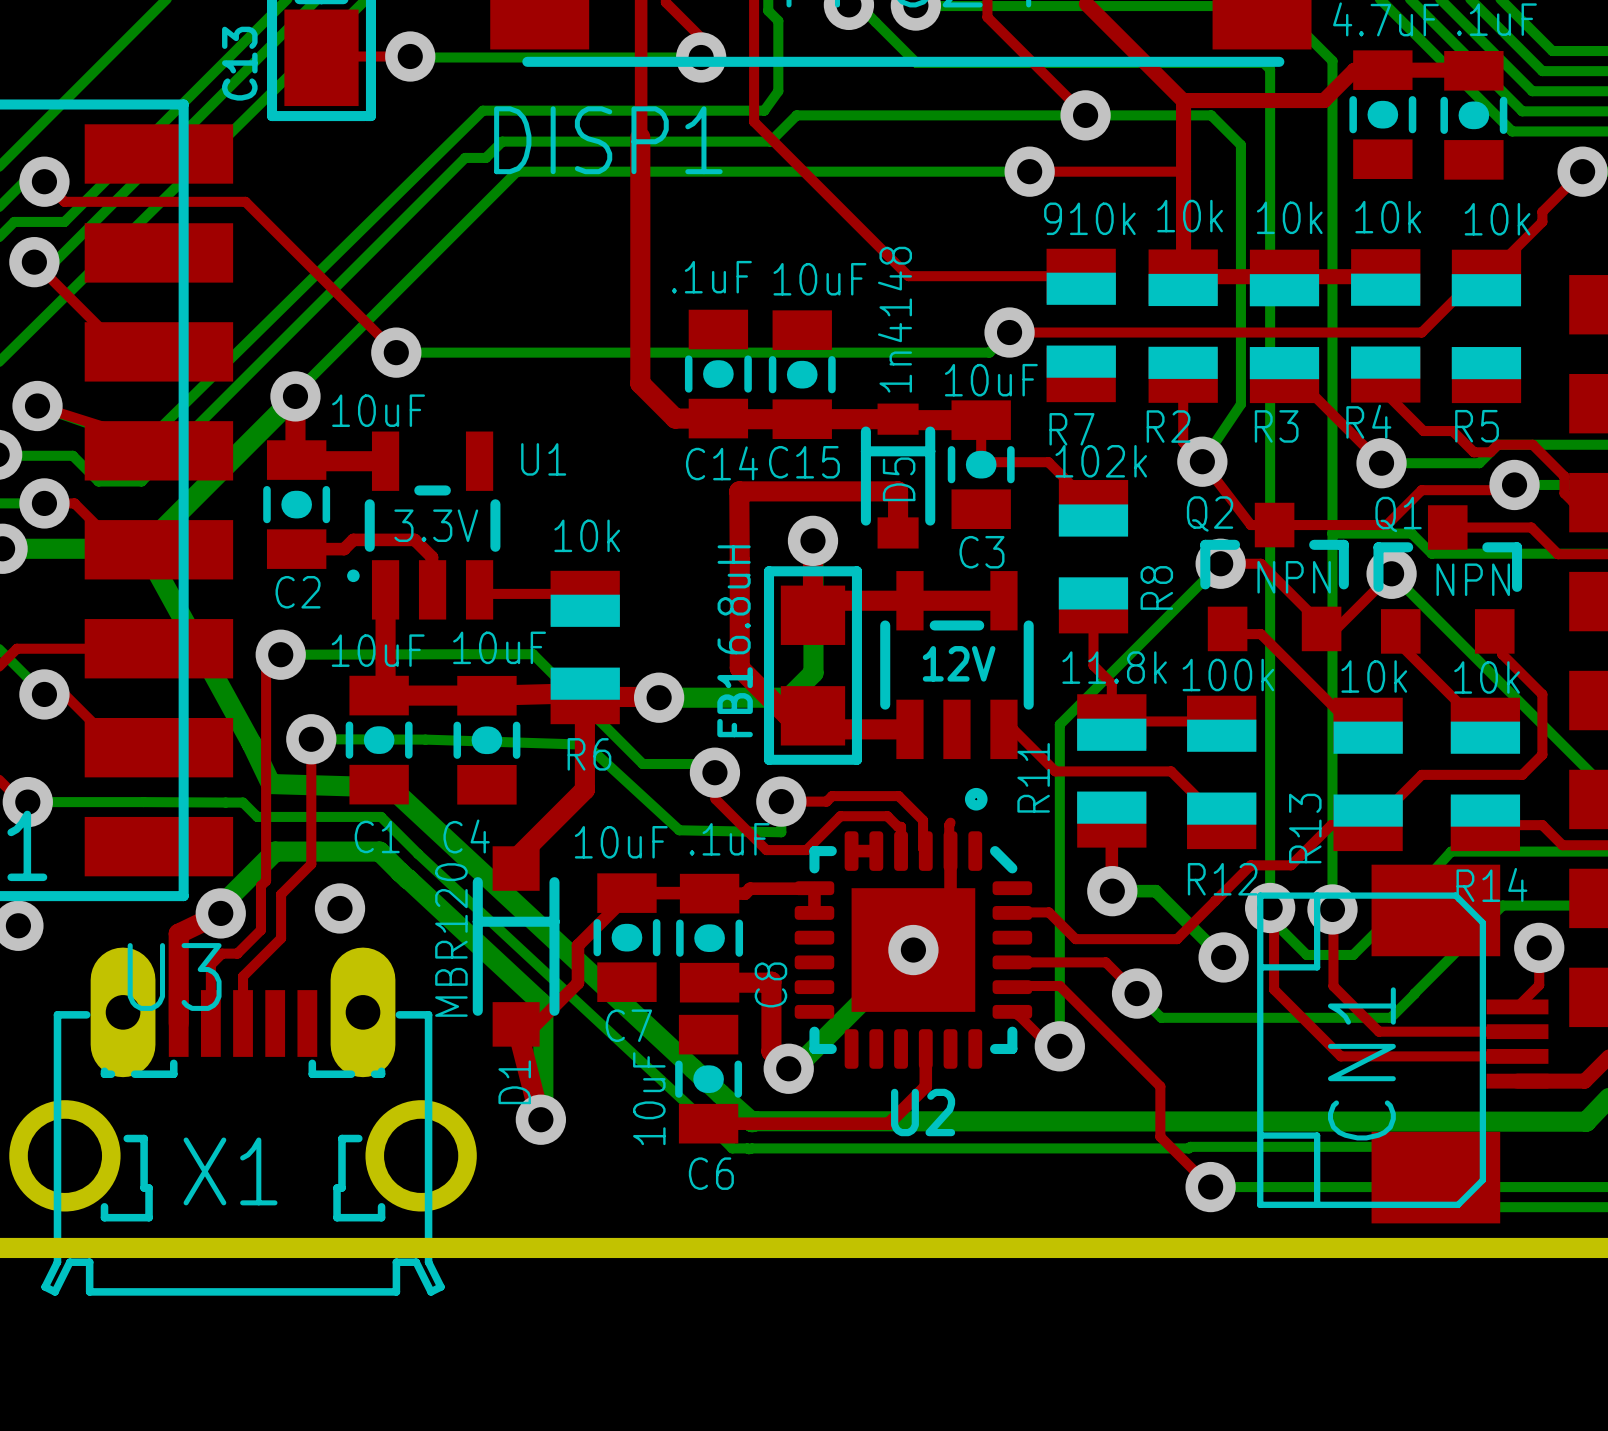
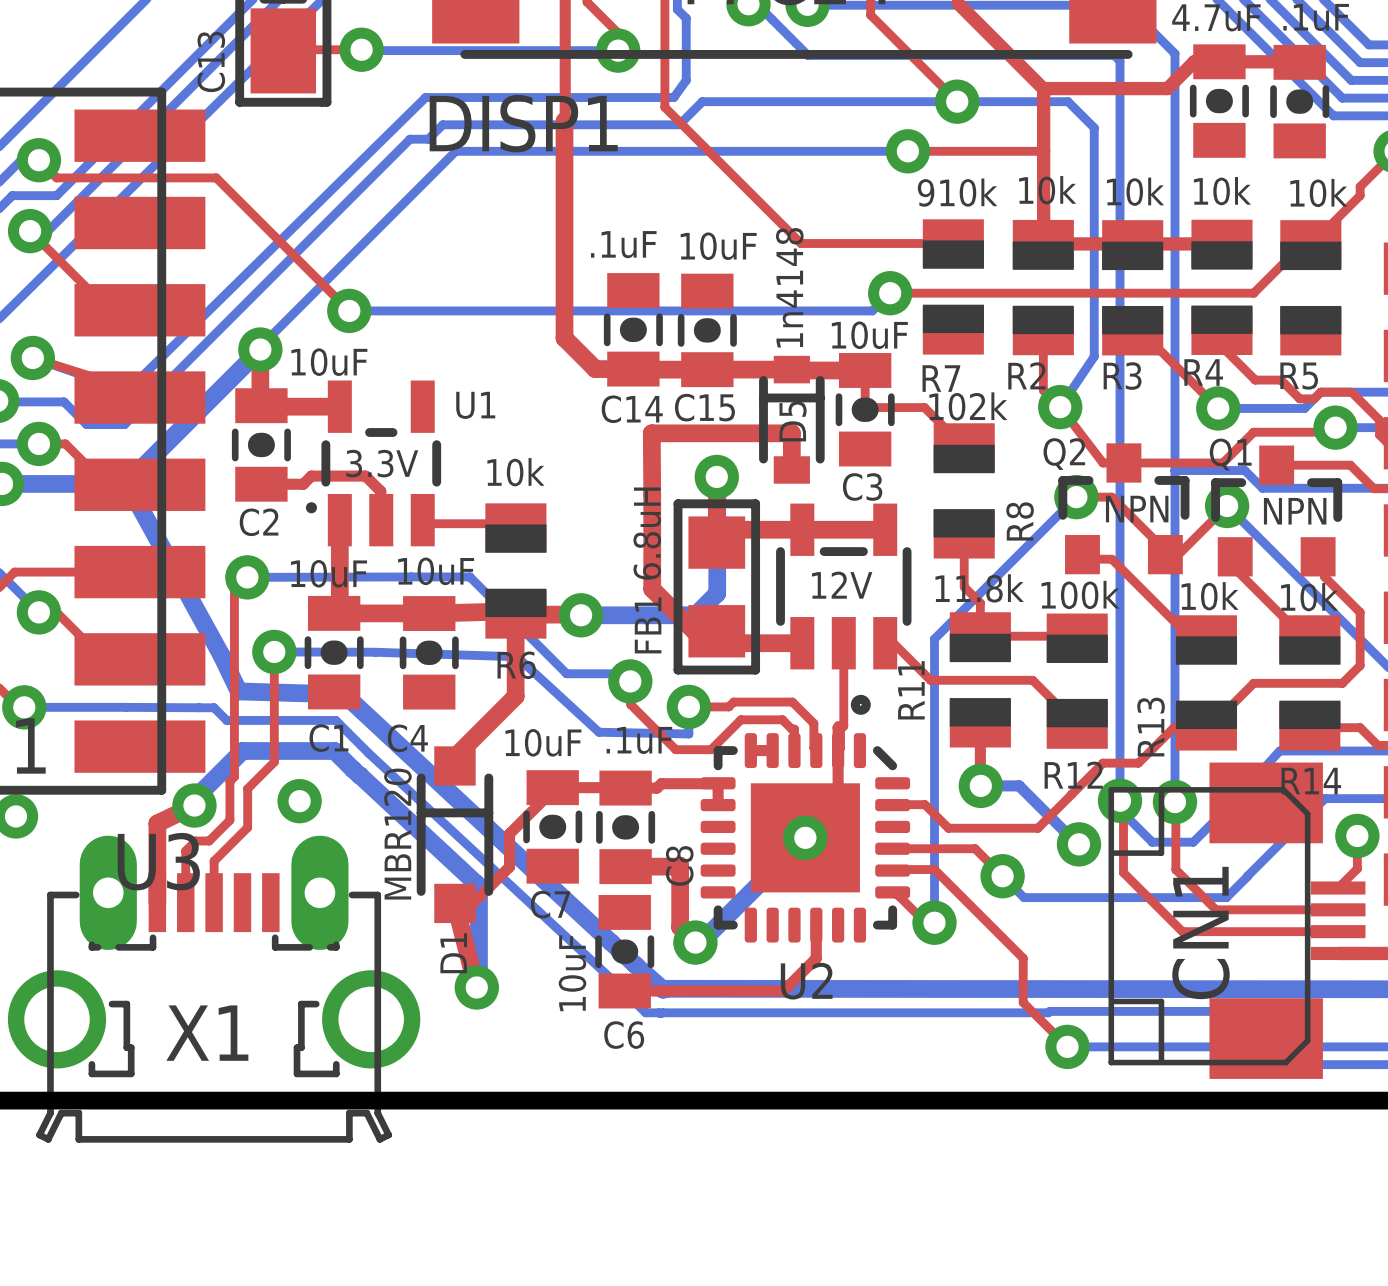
top track: none -> (843, 643) (843, 726) (840, 729) (840, 748) (838, 750)

